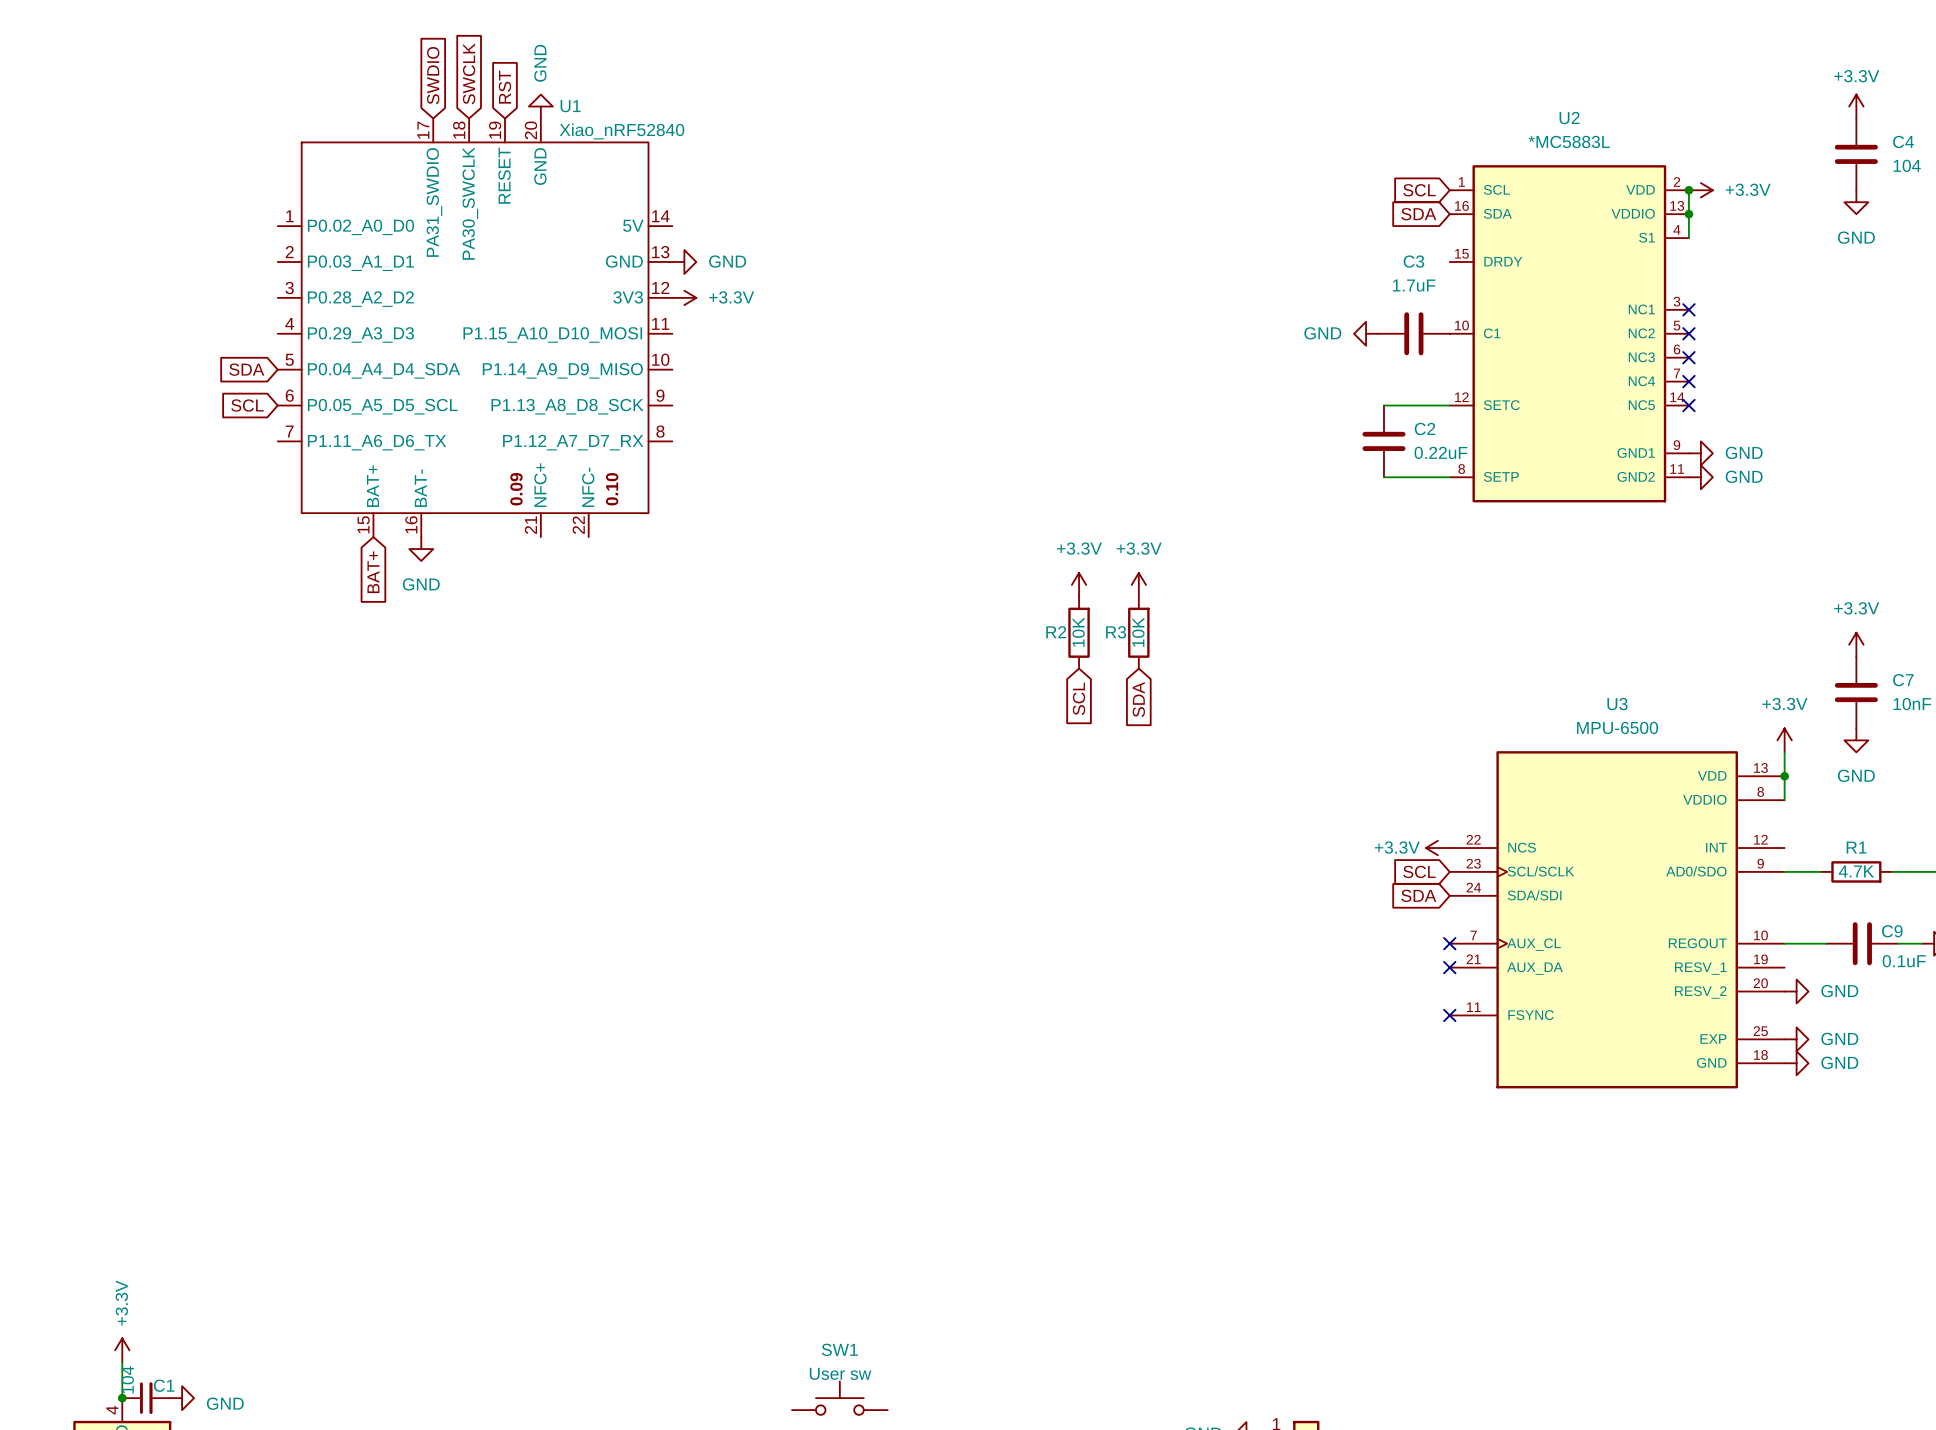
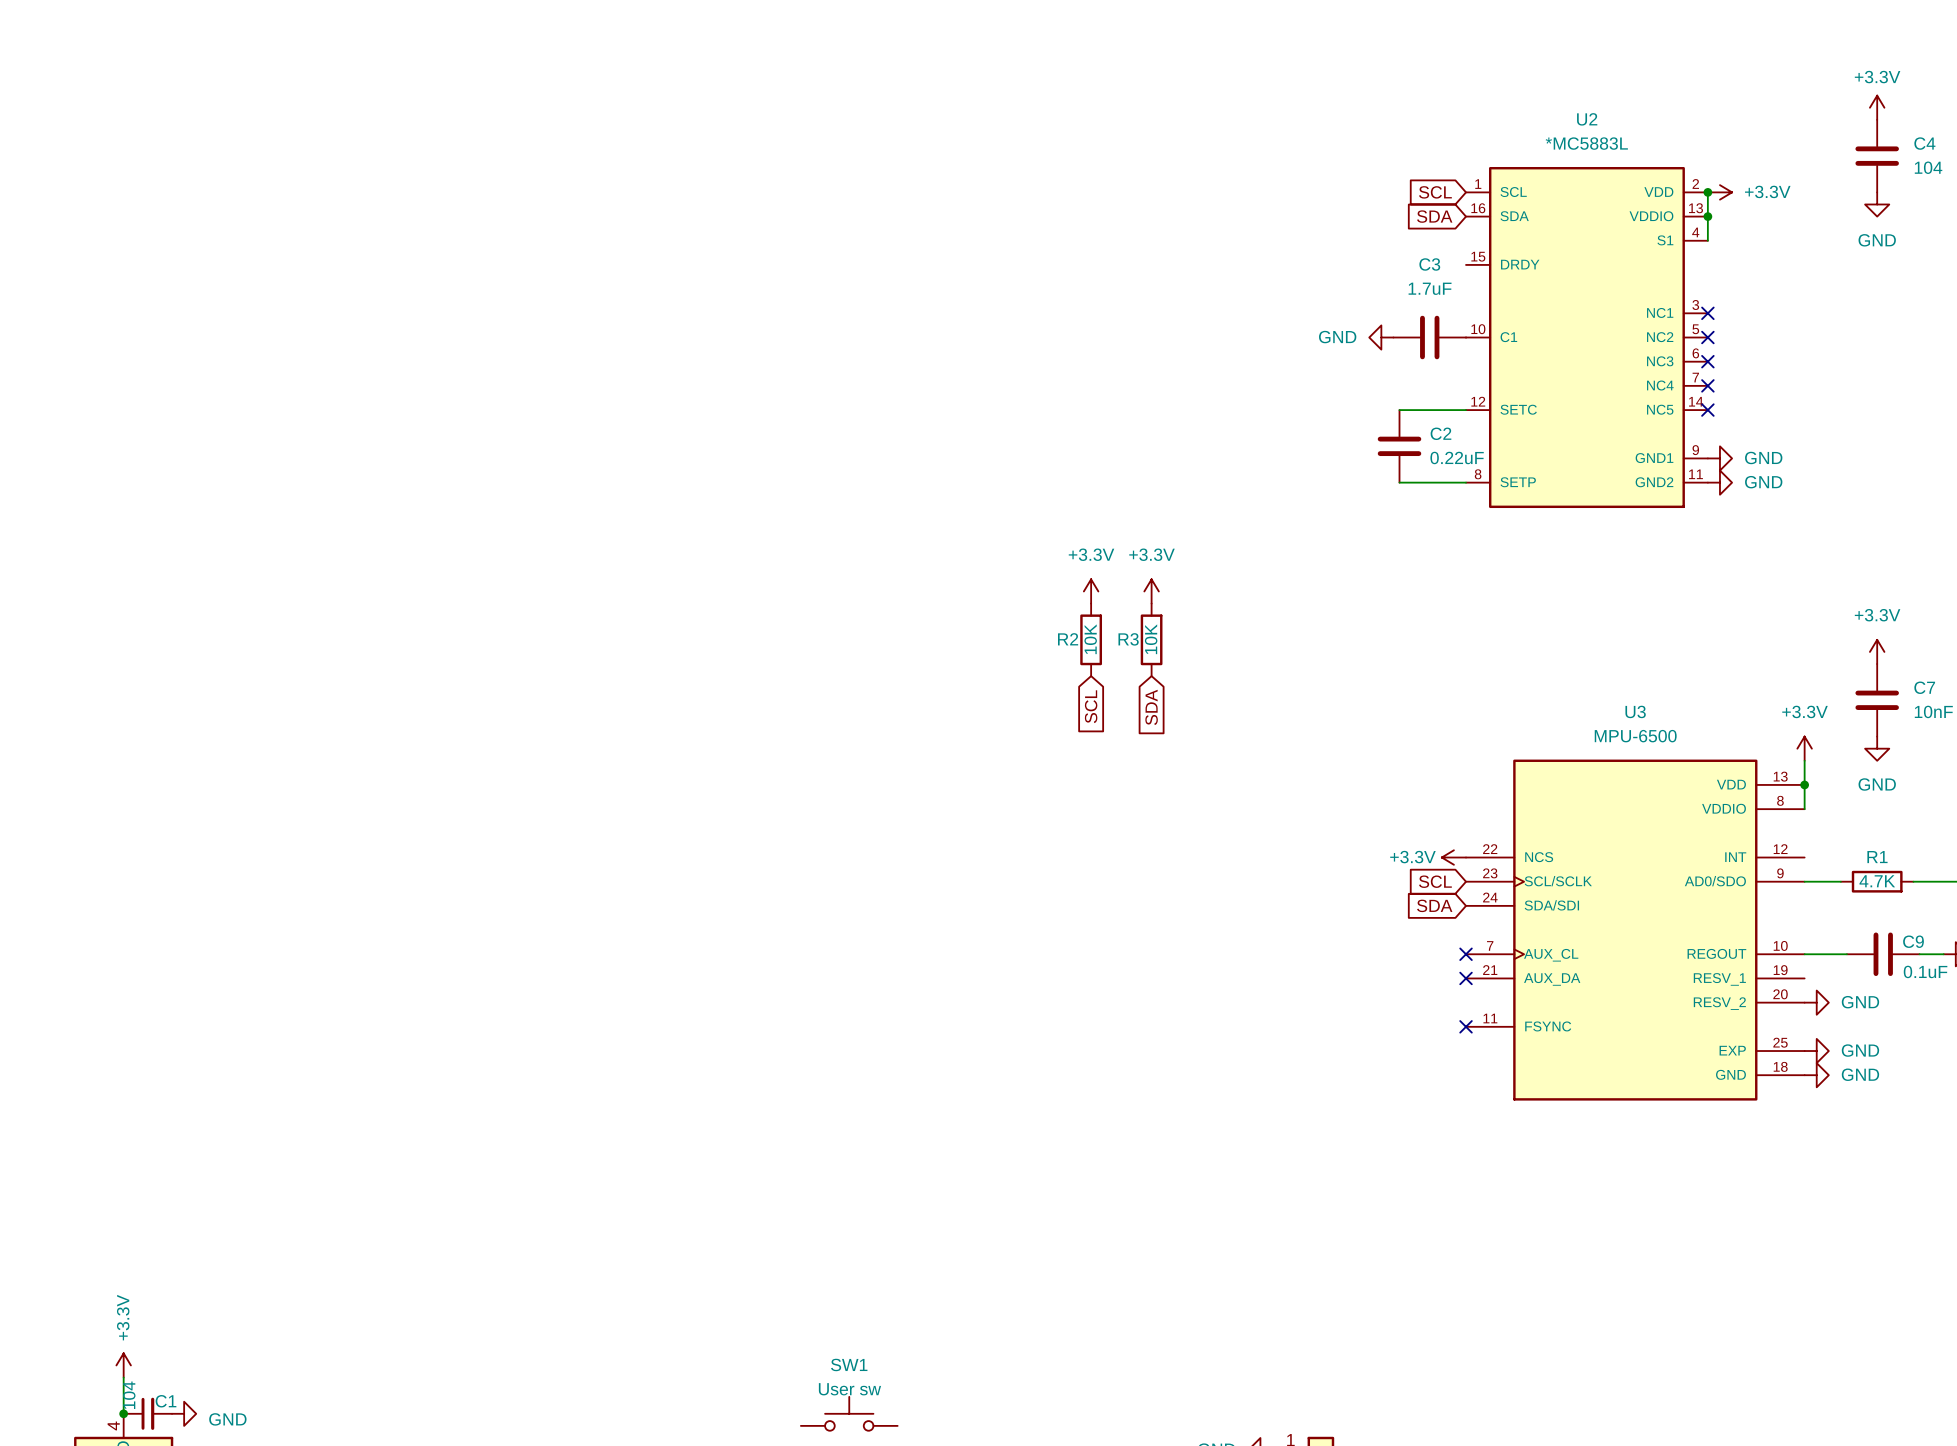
global label: SWCLK (469, 73) -> none
global label: SWDIO (433, 75) -> none
global label: RST (504, 87) -> none
power symbol: GND (540, 106) -> none
power symbol: GND (684, 262) -> none
power symbol: +3.3V (684, 297) -> none
U1: Xiao_nRF52840 (475, 327) -> none
global label: SDA (246, 369) -> none
global label: SCL (247, 405) -> none
power symbol: GND (421, 549) -> none
global label: BAT+ (373, 572) -> none

